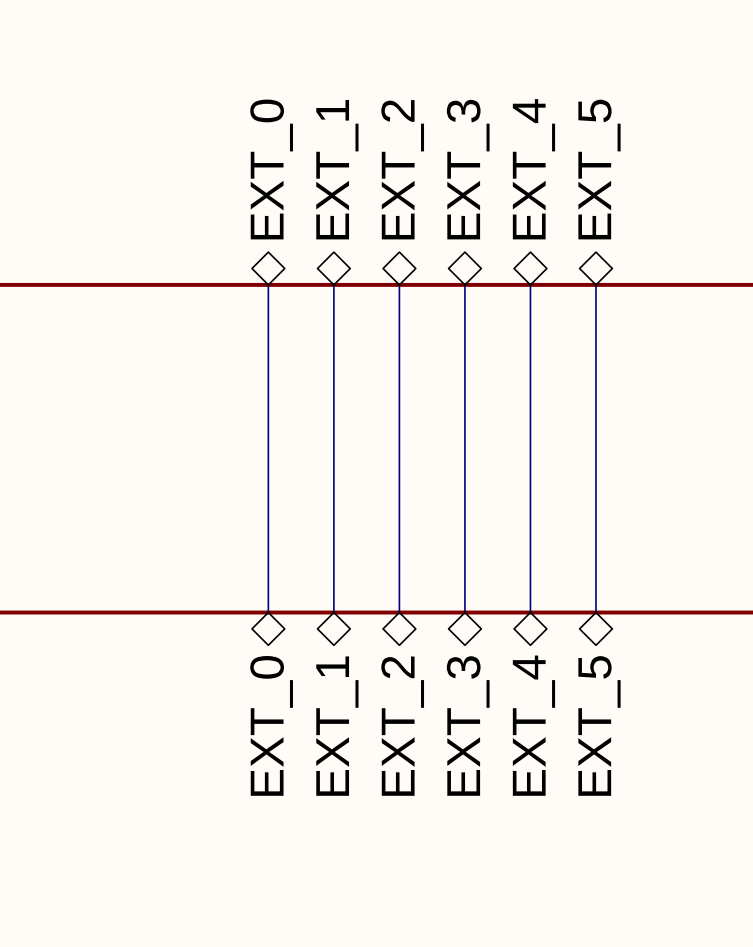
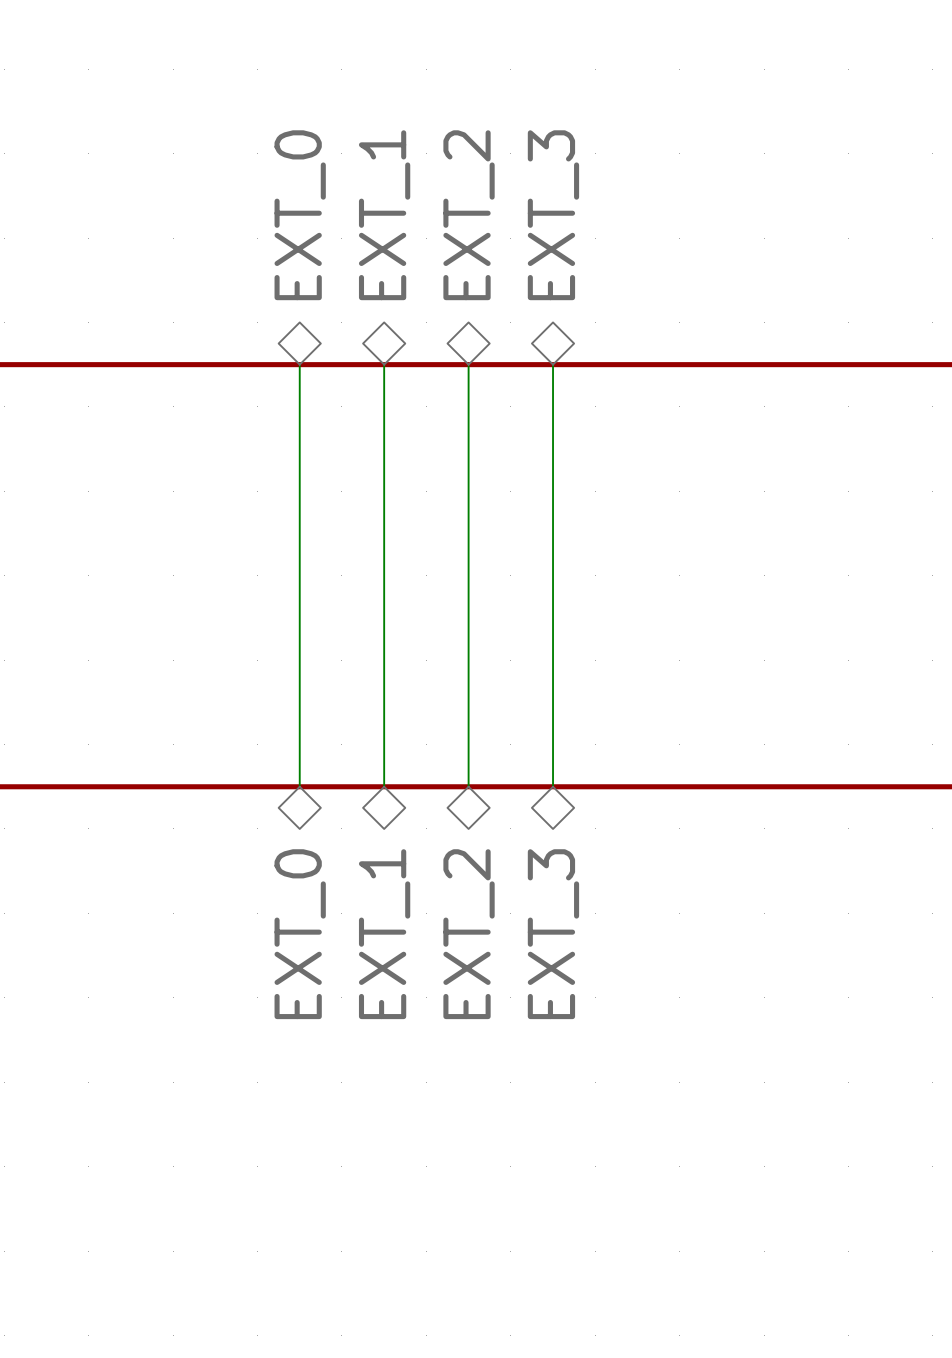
sheet pin: EXT_4 (533, 169) -> none
sheet pin: EXT_5 (599, 169) -> none
wire: (530, 284) (530, 612) -> none
wire: (595, 284) (595, 612) -> none
sheet pin: EXT_4 (533, 725) -> none
sheet pin: EXT_5 (599, 725) -> none

